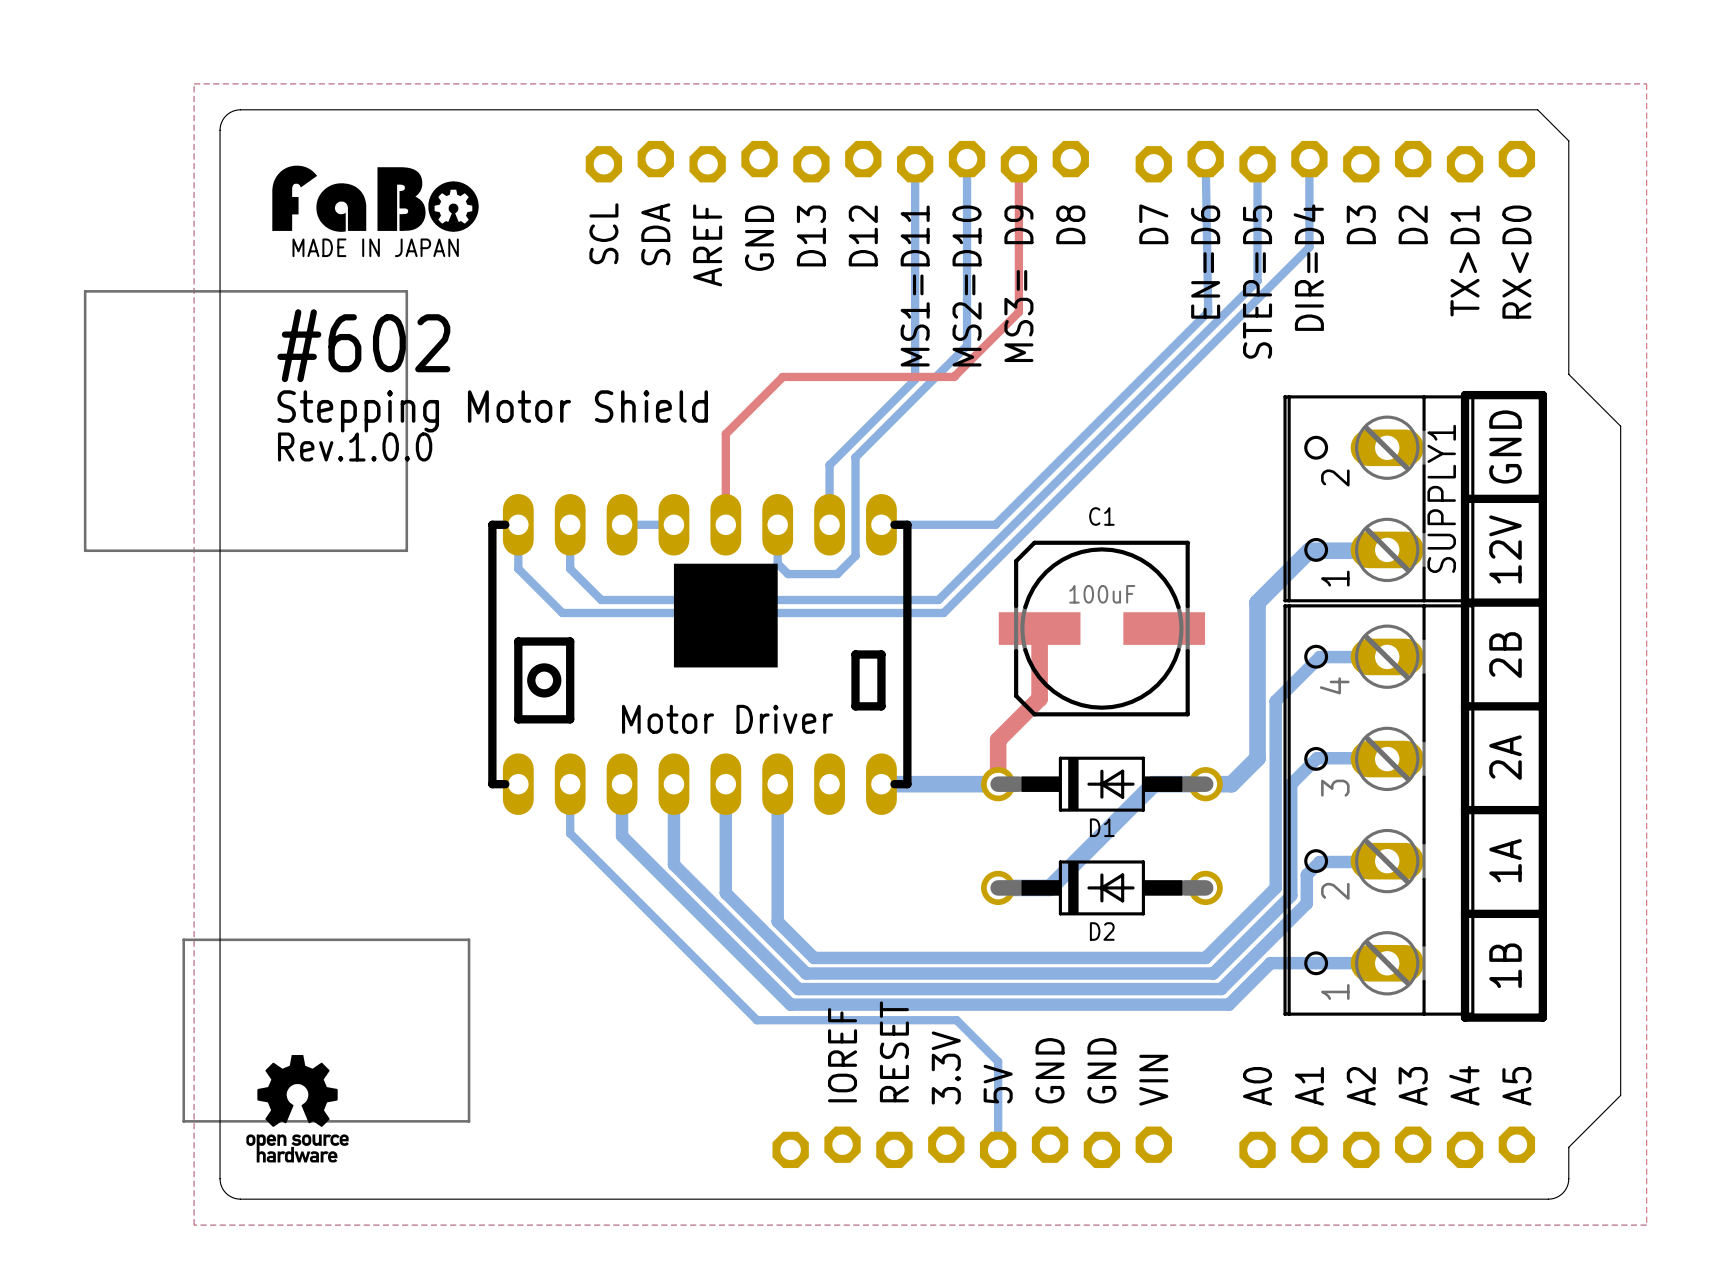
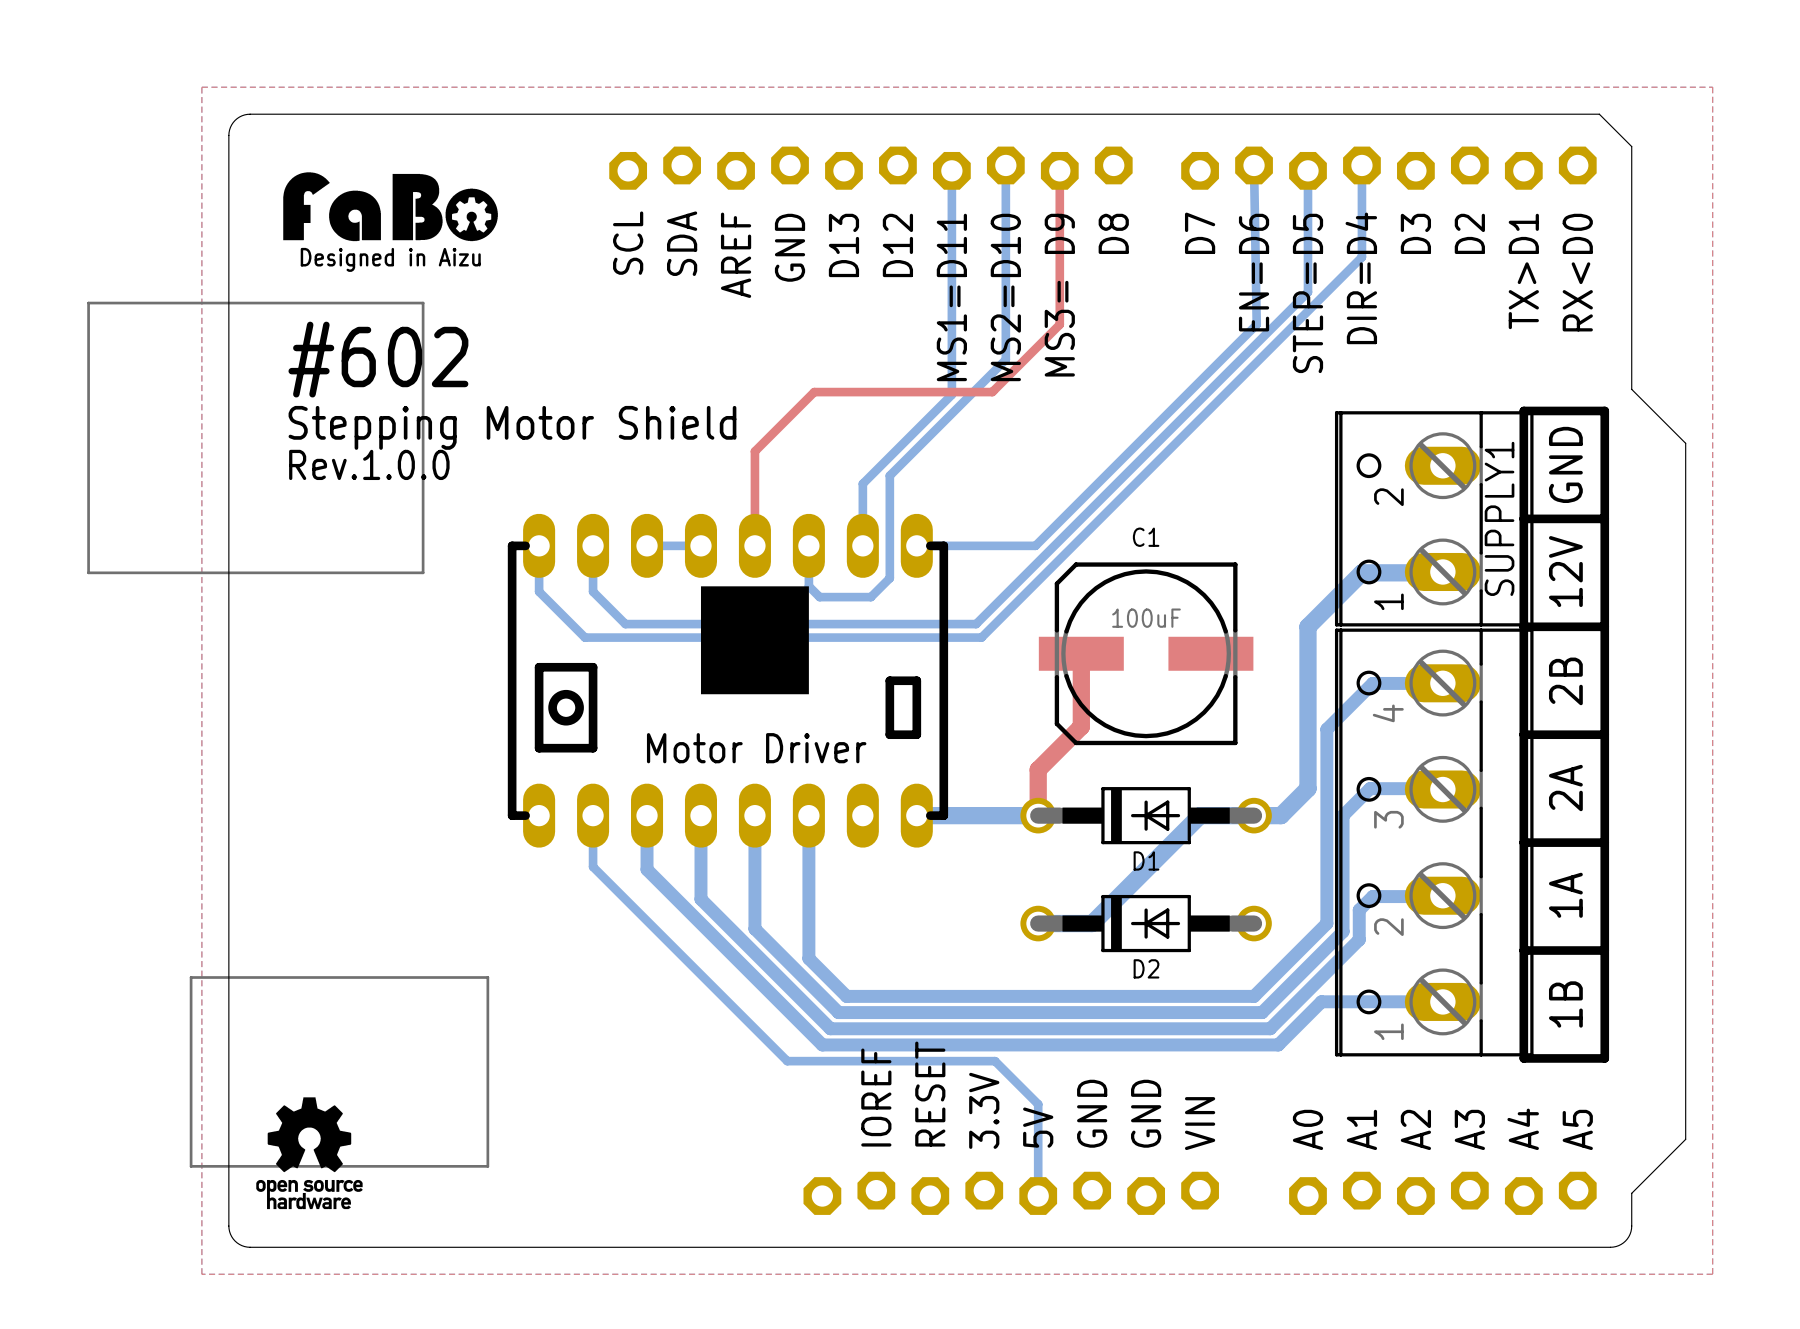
text: MADE IN JAPAN (375, 247) -> Designed in Aizu (390, 259)

